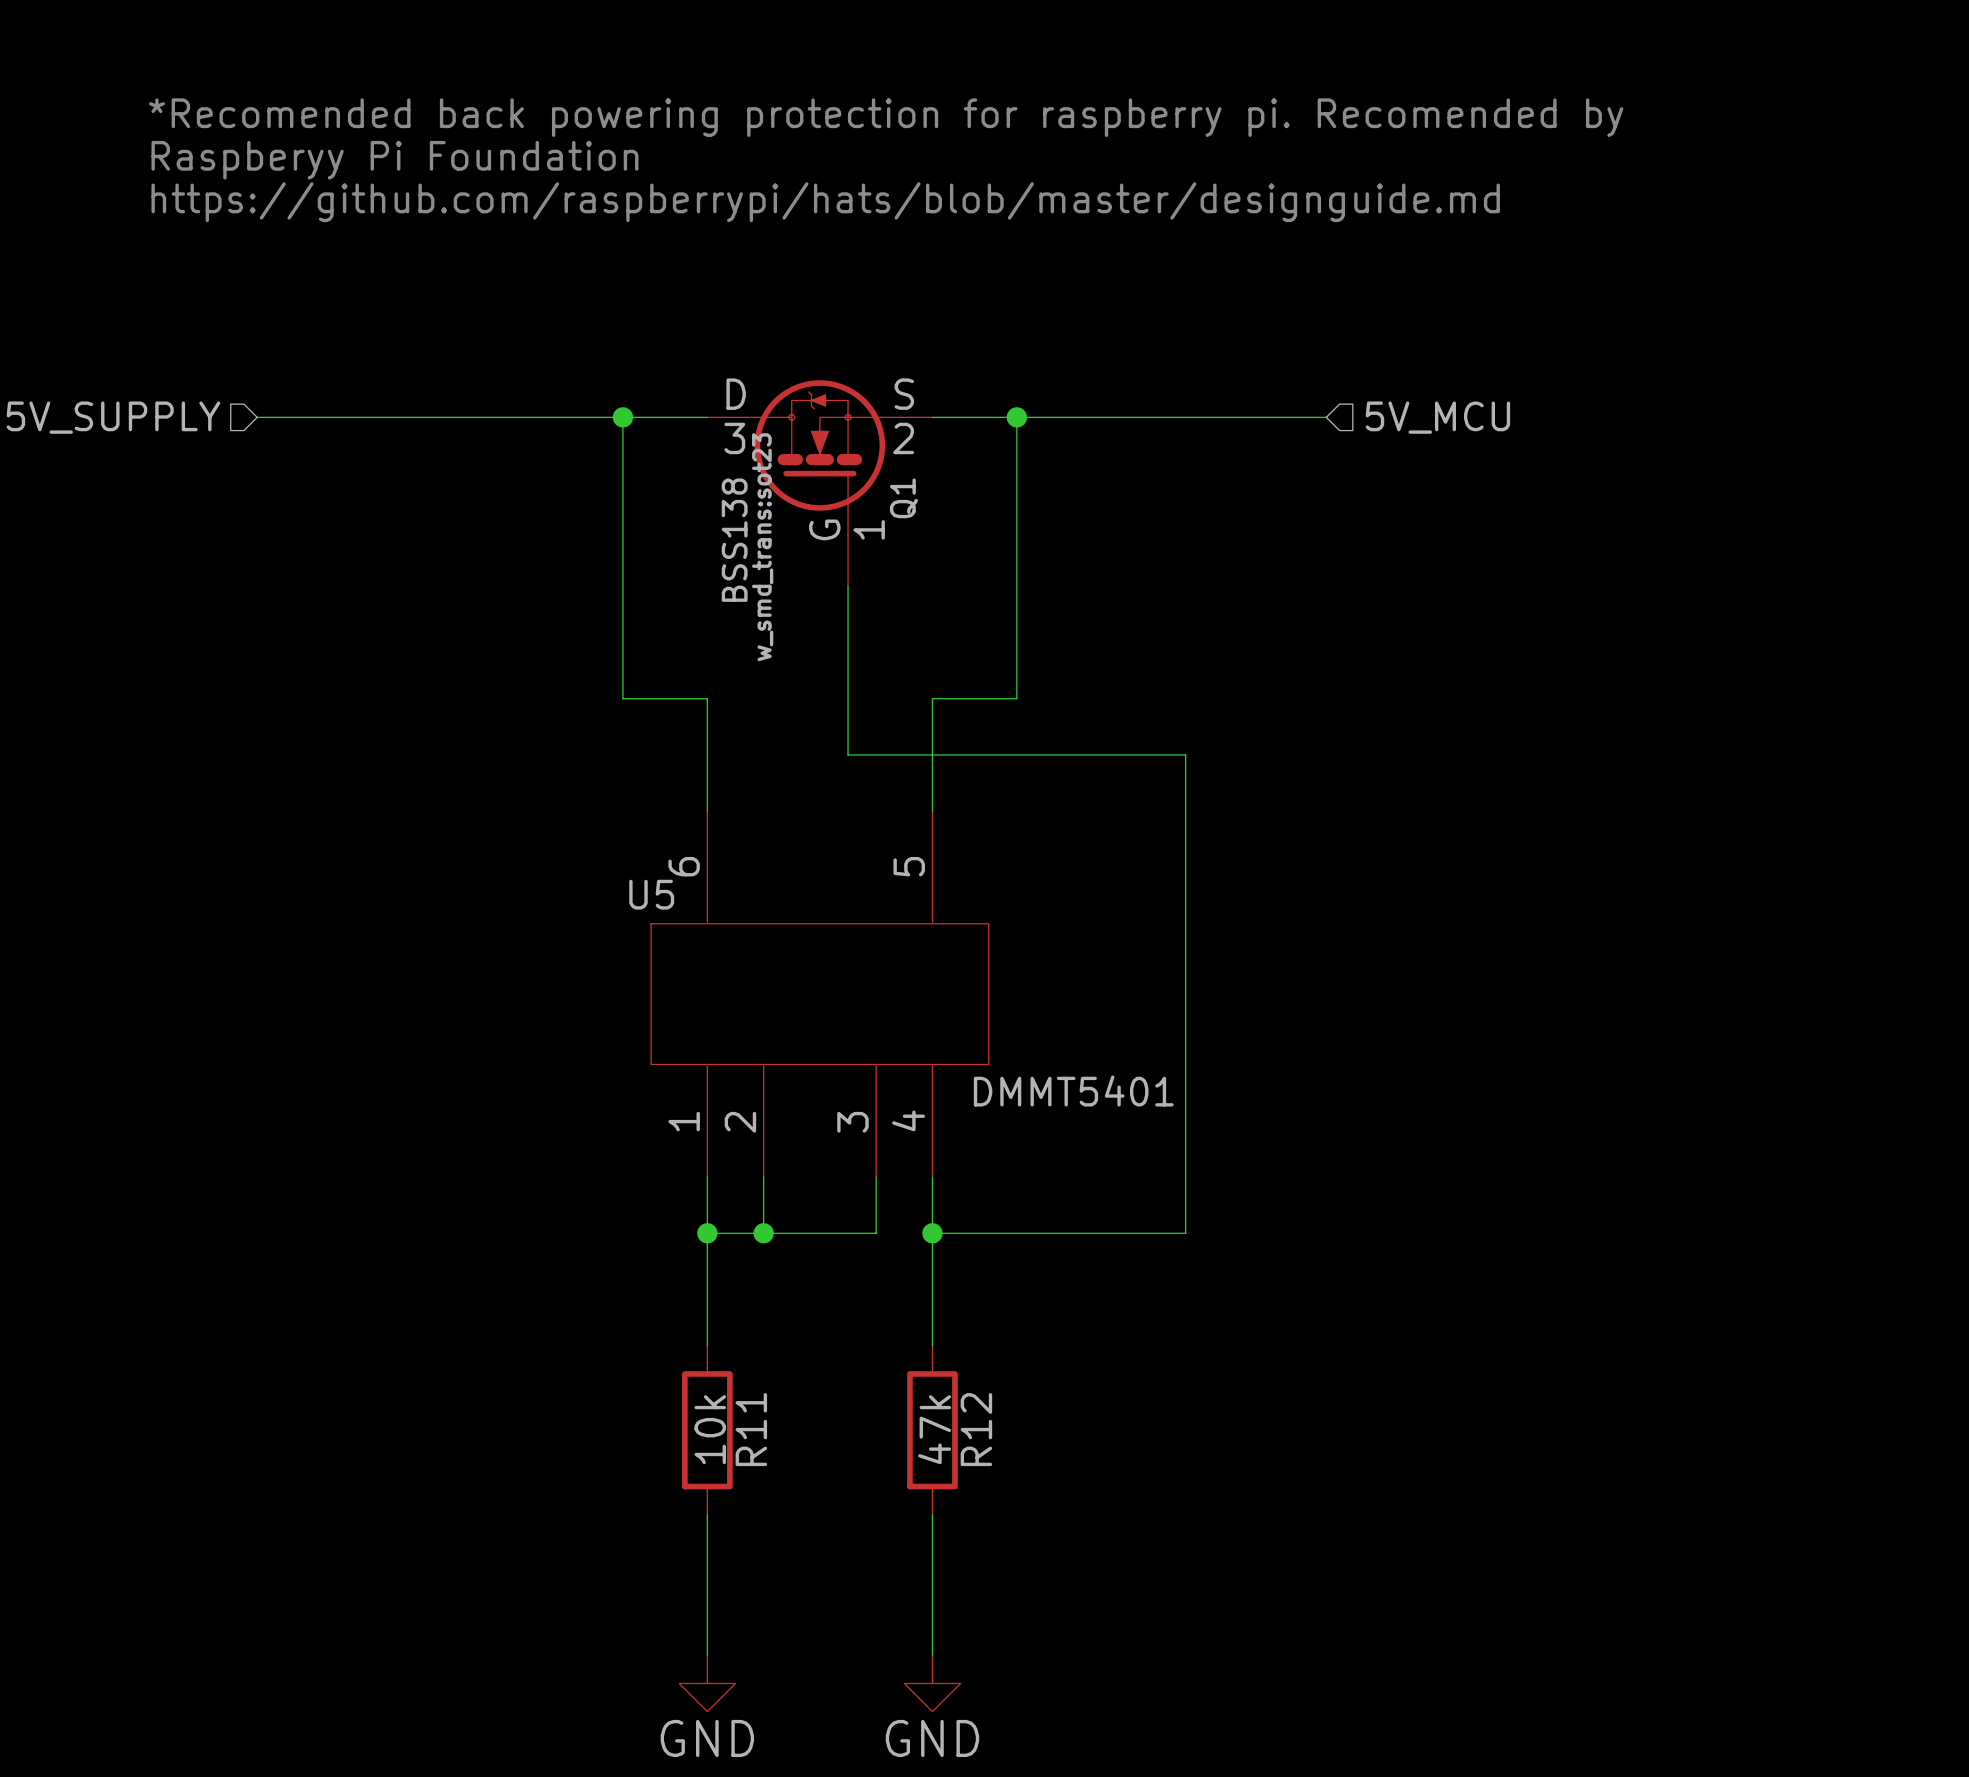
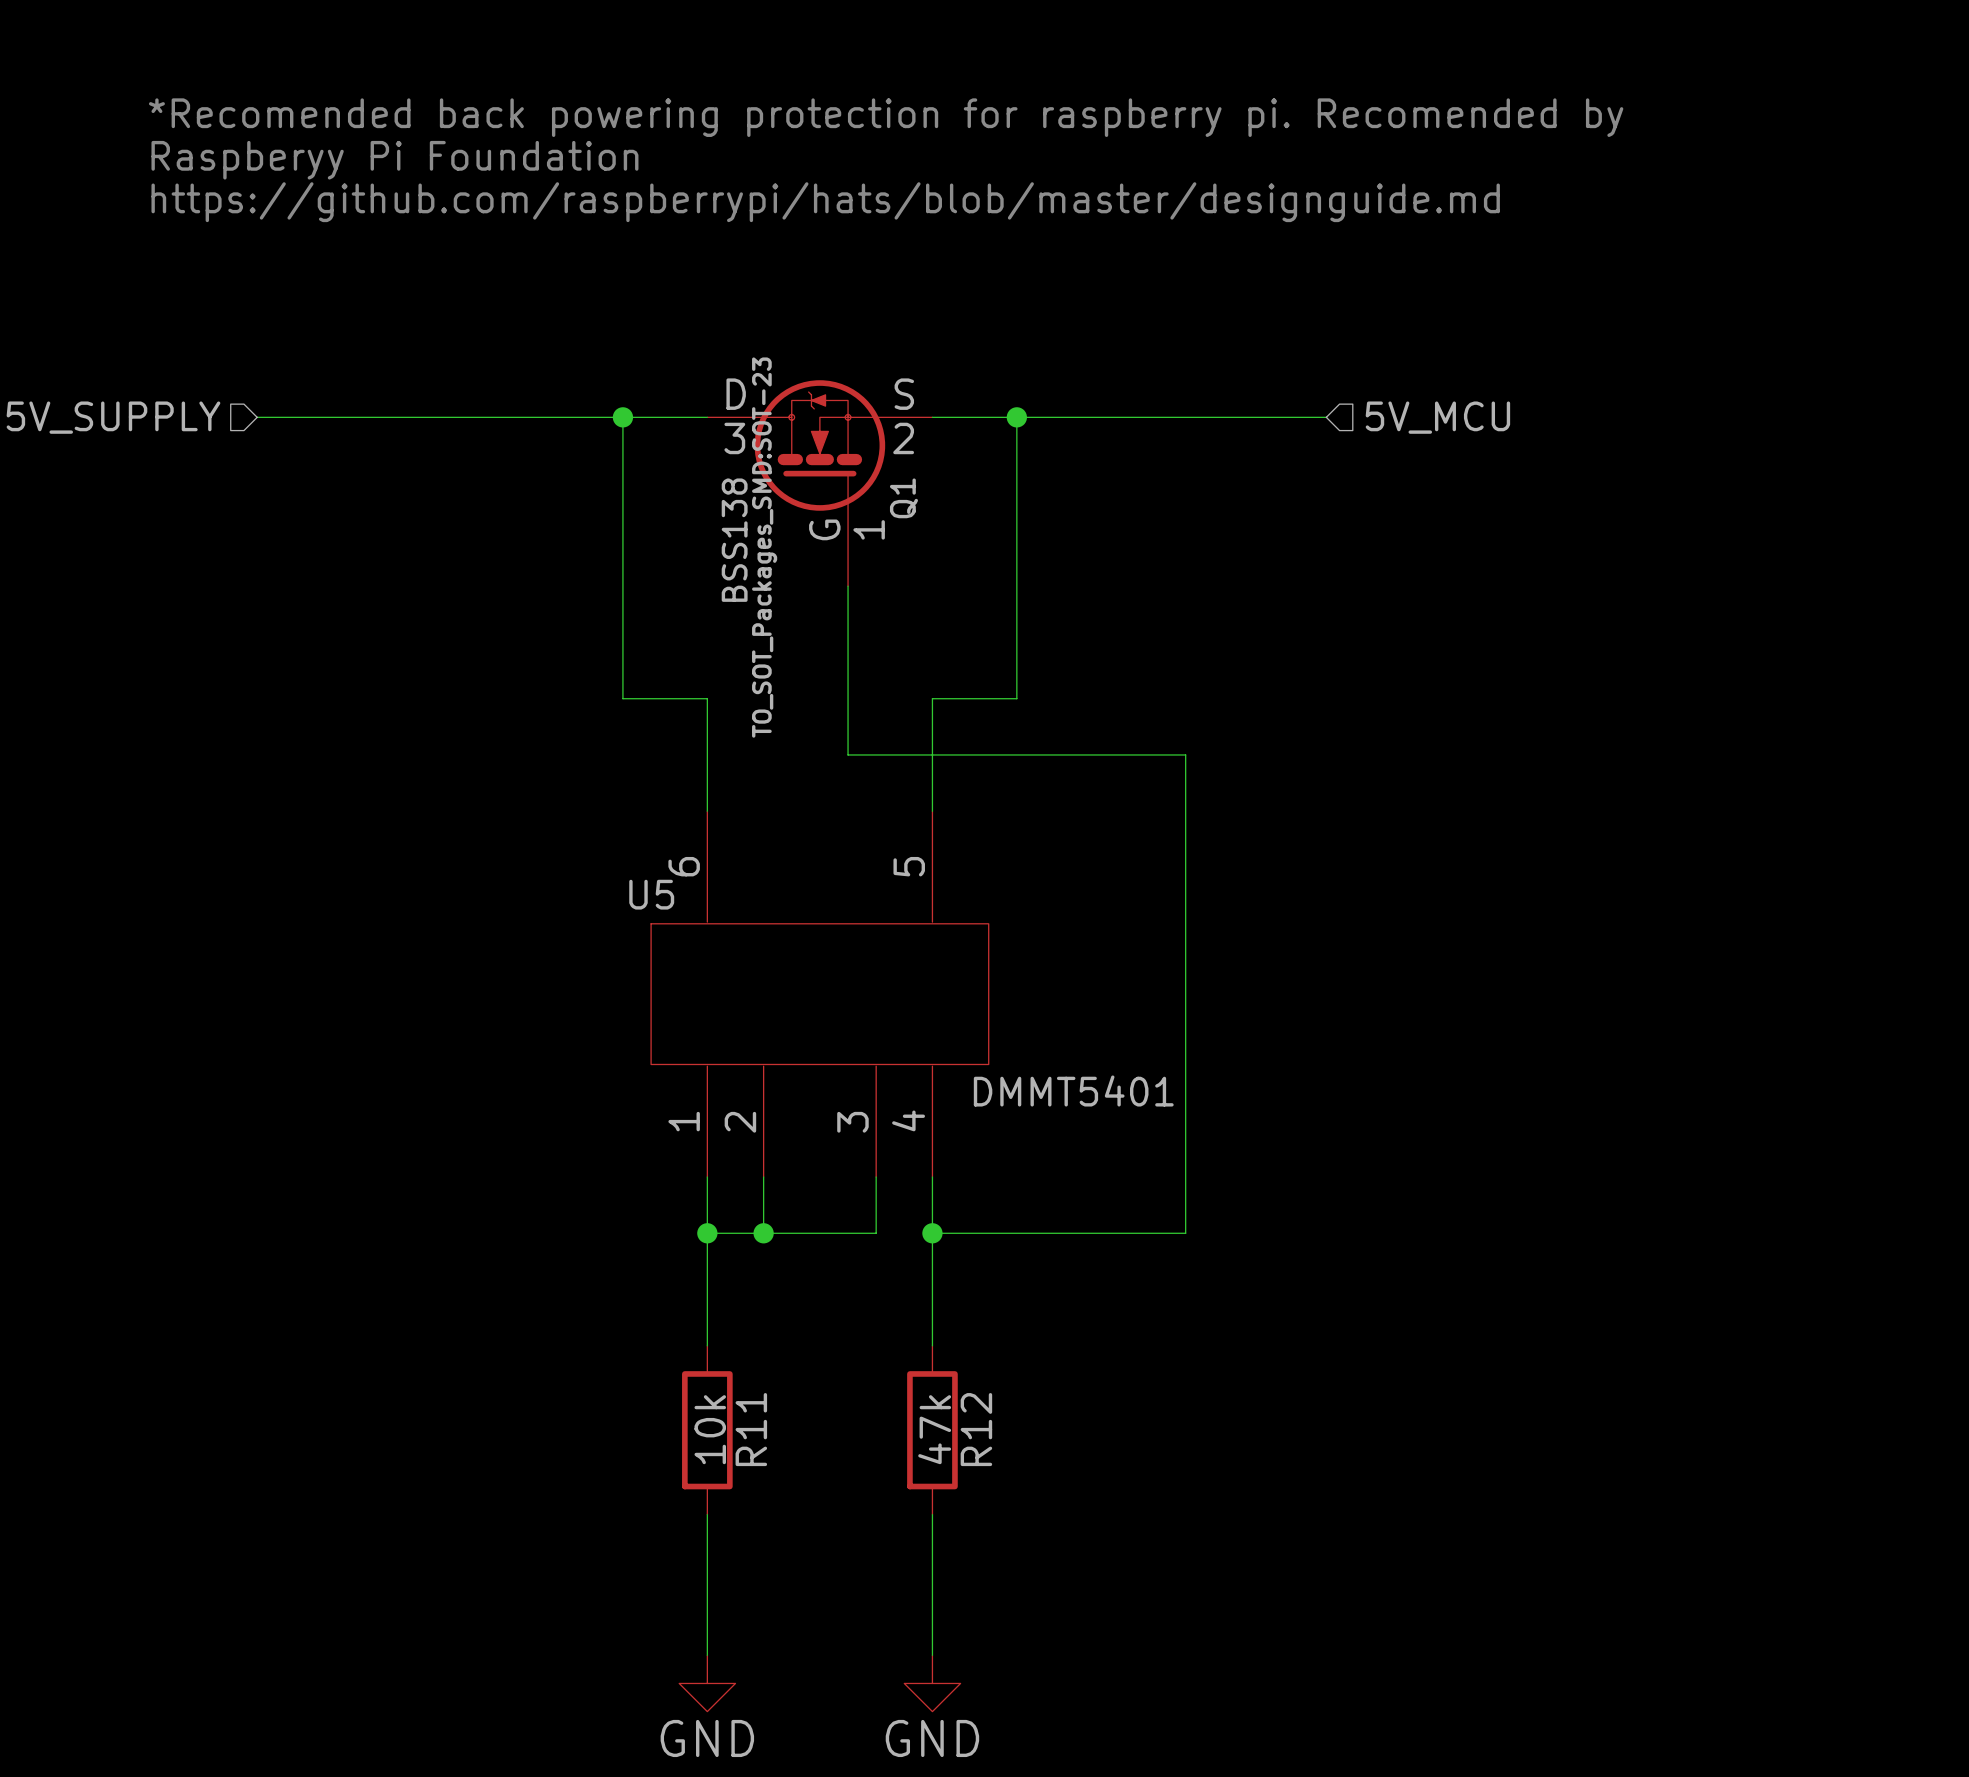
Q1 text: w_smd_trans:sot23 (762, 547) -> TO_SOT_Packages_SMD:SOT-23 (764, 547)

